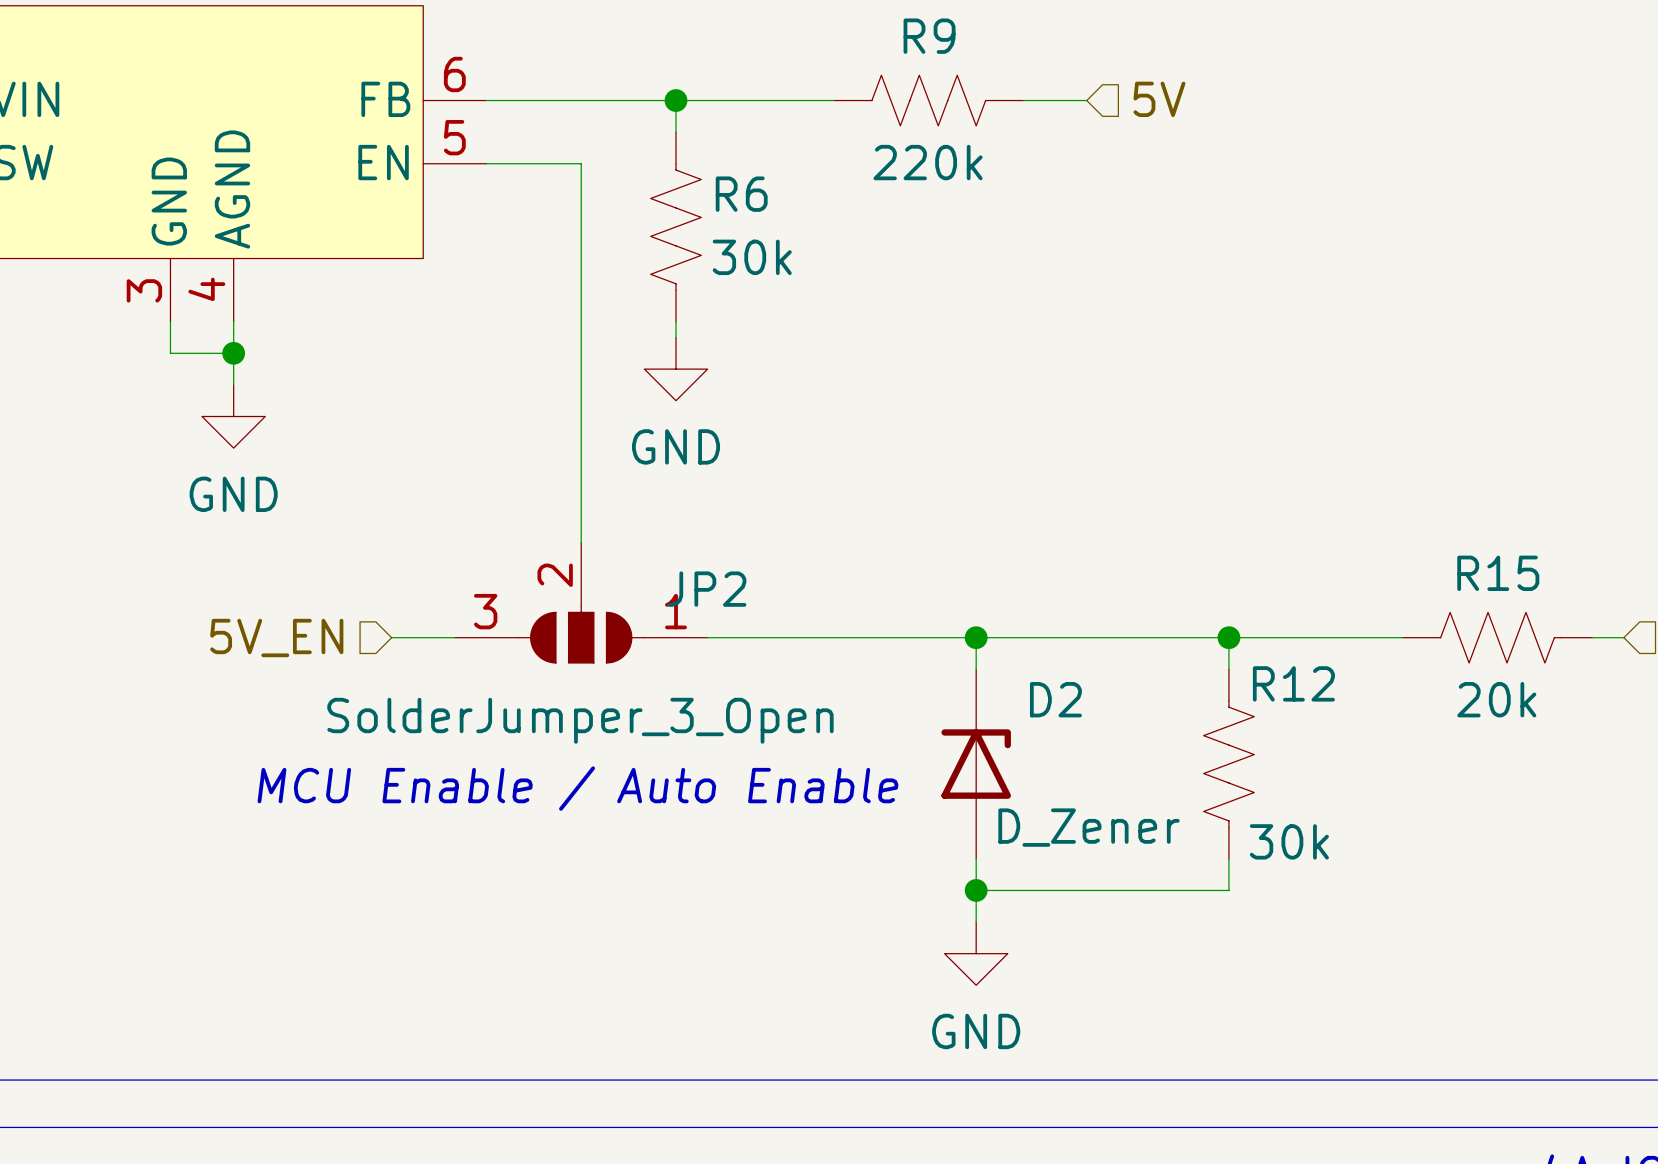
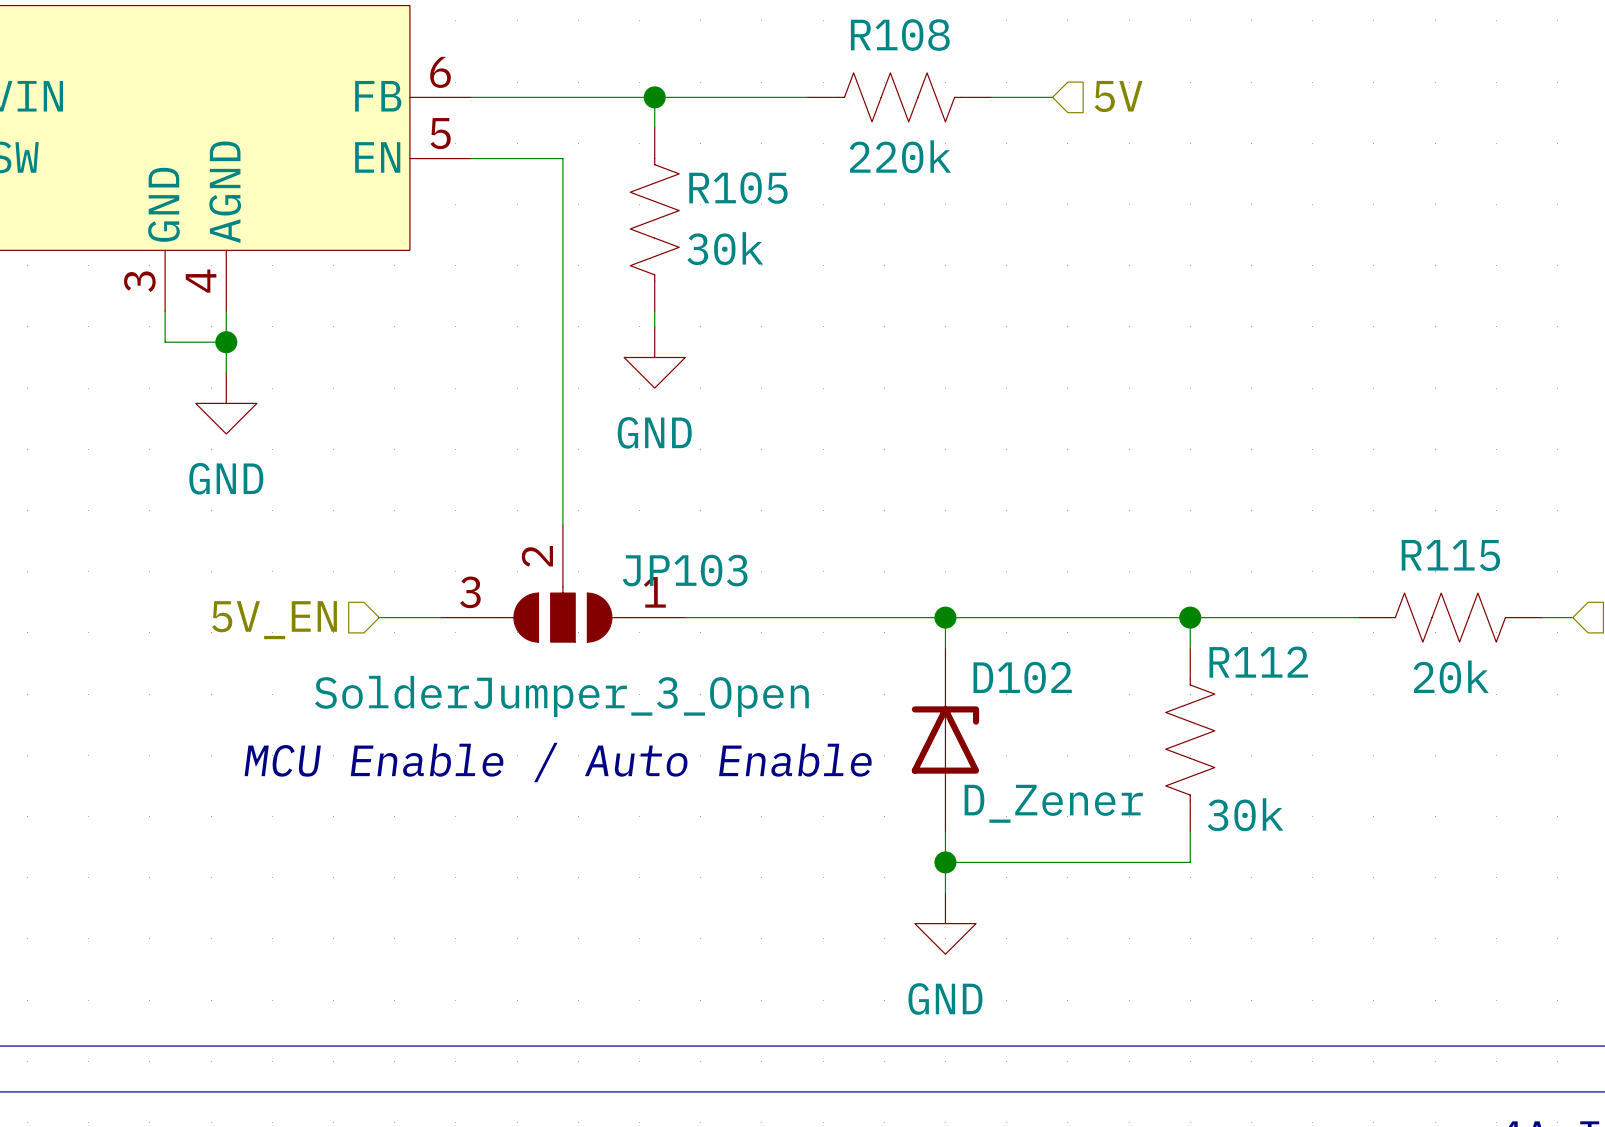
R9 name: R9 (929, 36) -> R108 (900, 35)
R6 name: R6 (741, 194) -> R105 (738, 188)
R15 name: R15 (1498, 573) -> R115 (1450, 555)
JP2 name: JP2 (706, 589) -> JP103 (685, 570)
R12 name: R12 (1293, 683) -> R112 (1258, 662)
D2 name: D2 (1055, 699) -> D102 (1022, 677)

